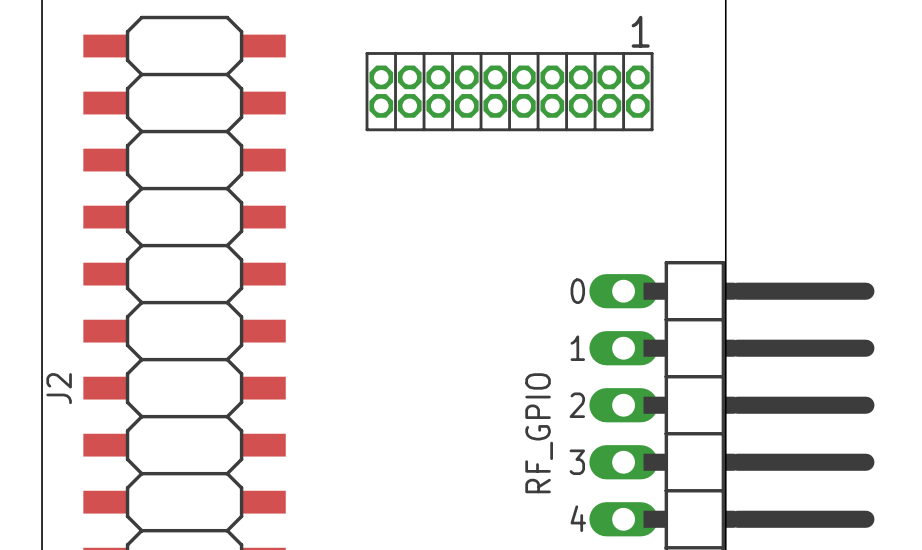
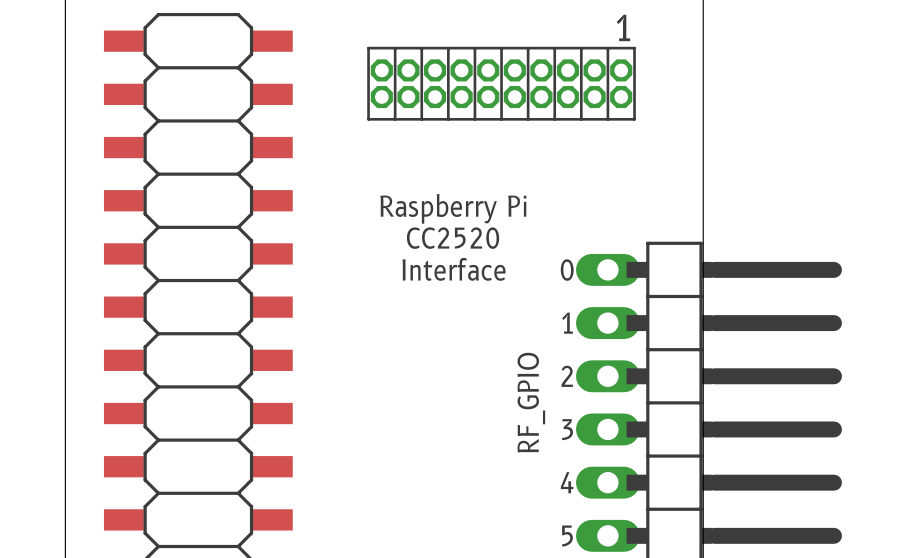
text: none -> Raspberry Pi (453, 208)
text: none -> CC2520 (453, 238)
text: none -> Interface (453, 269)
J2 name: J2 (59, 388) -> none

